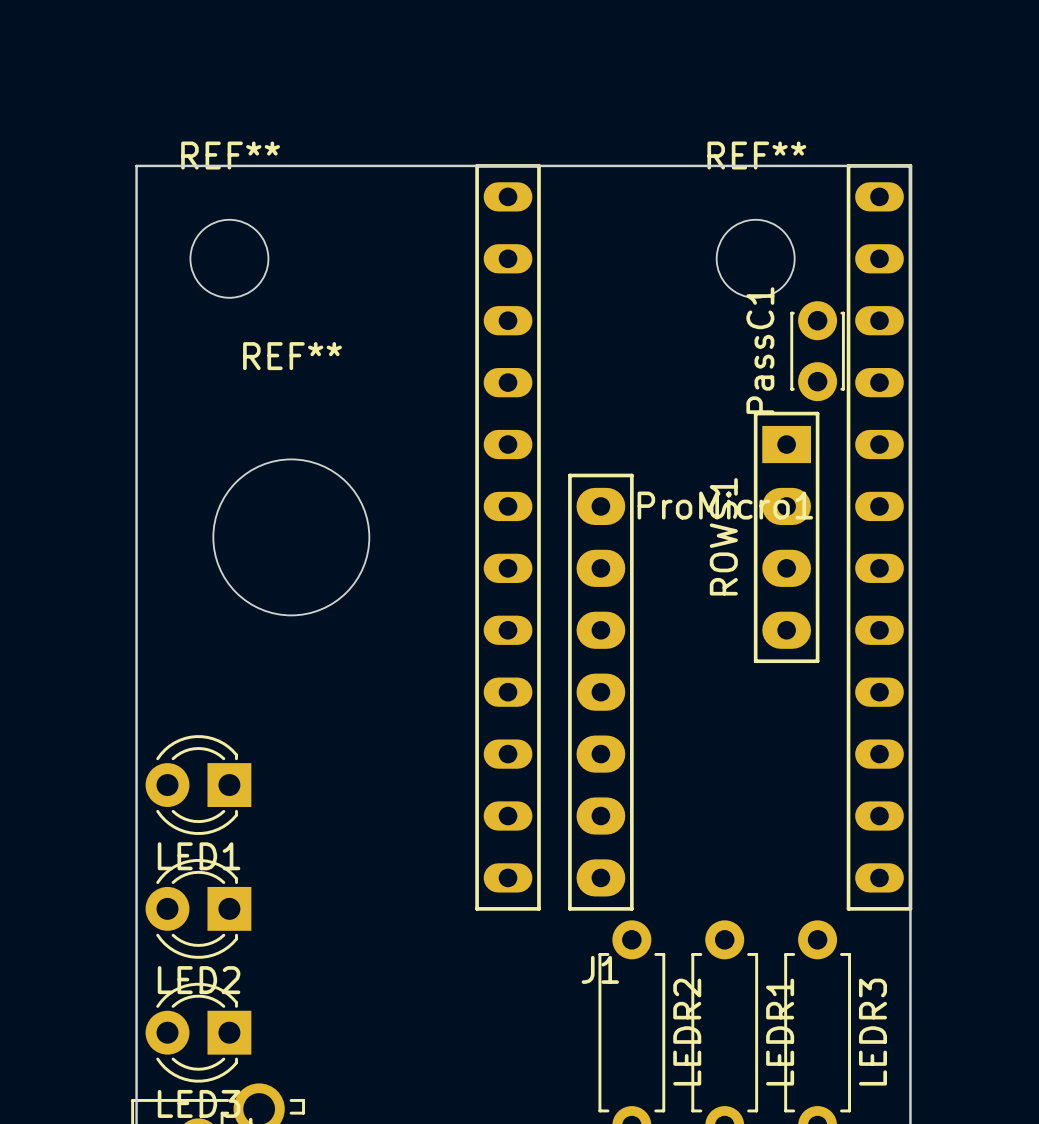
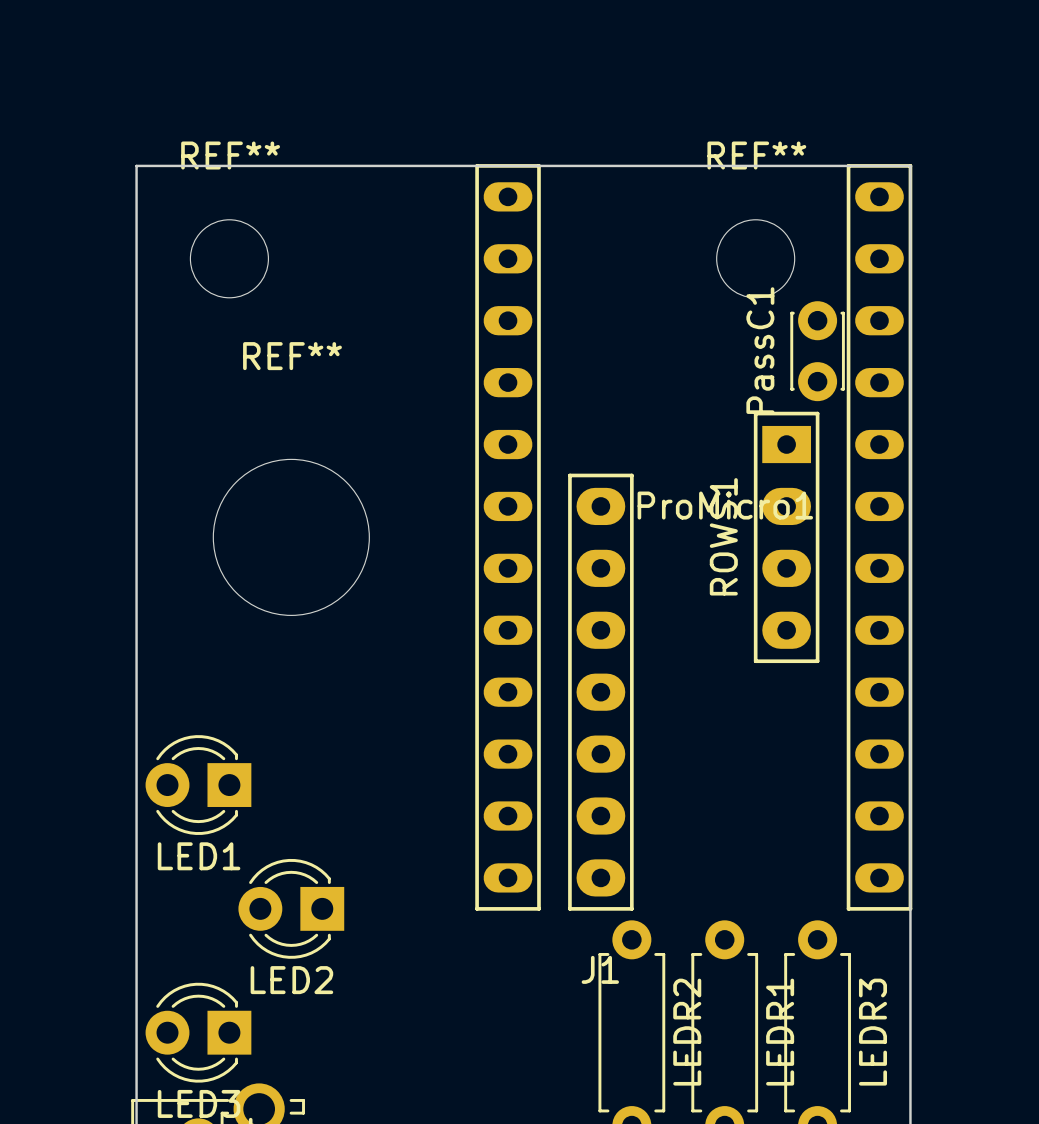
LED2 position: (198, 908) -> (291, 908)

